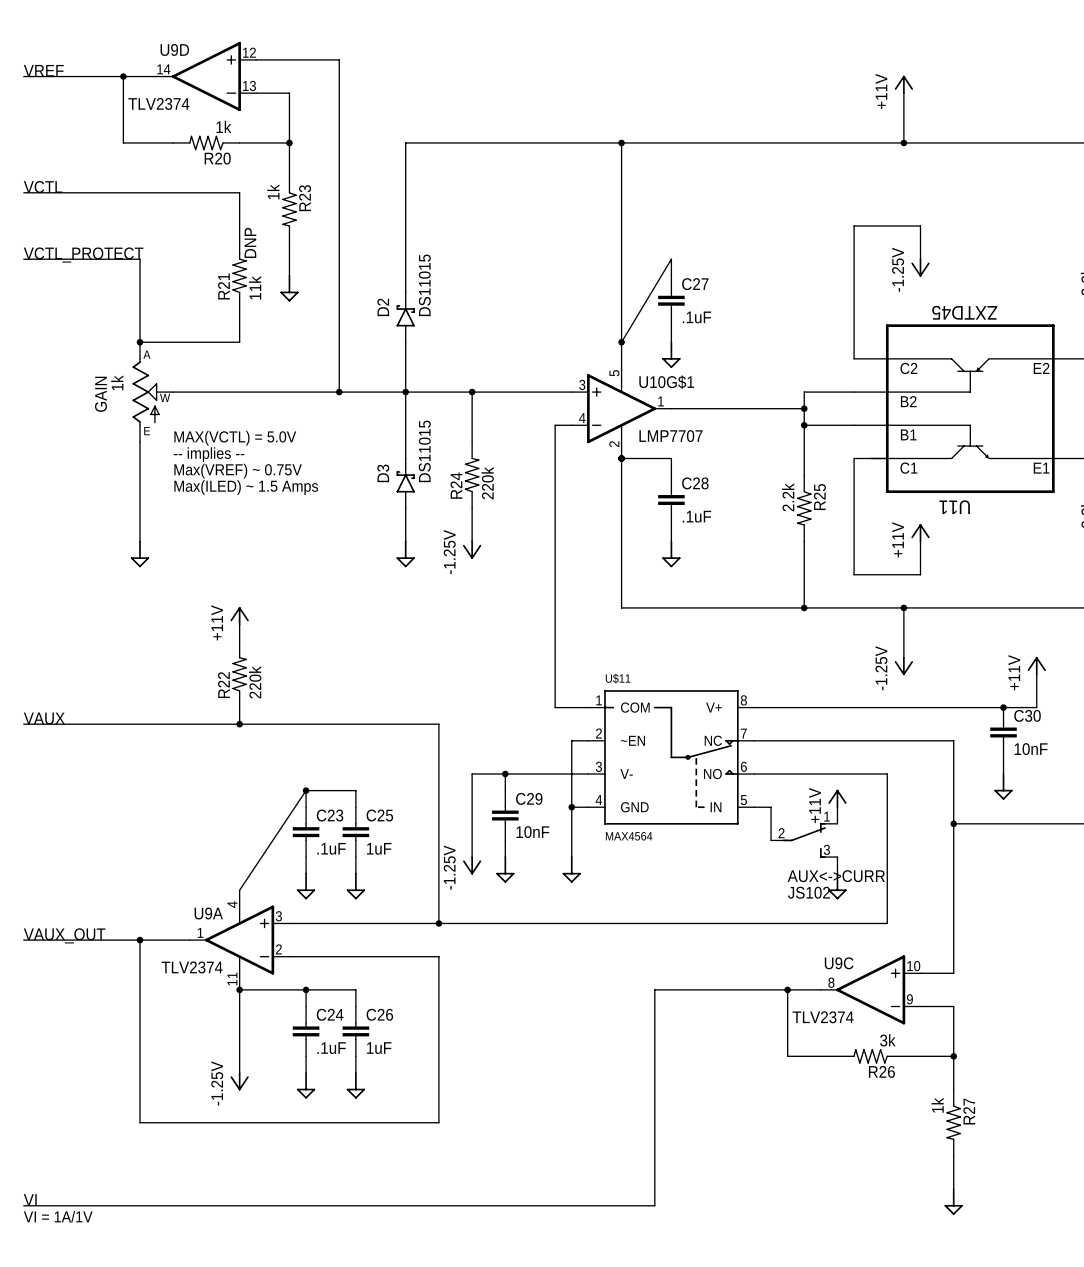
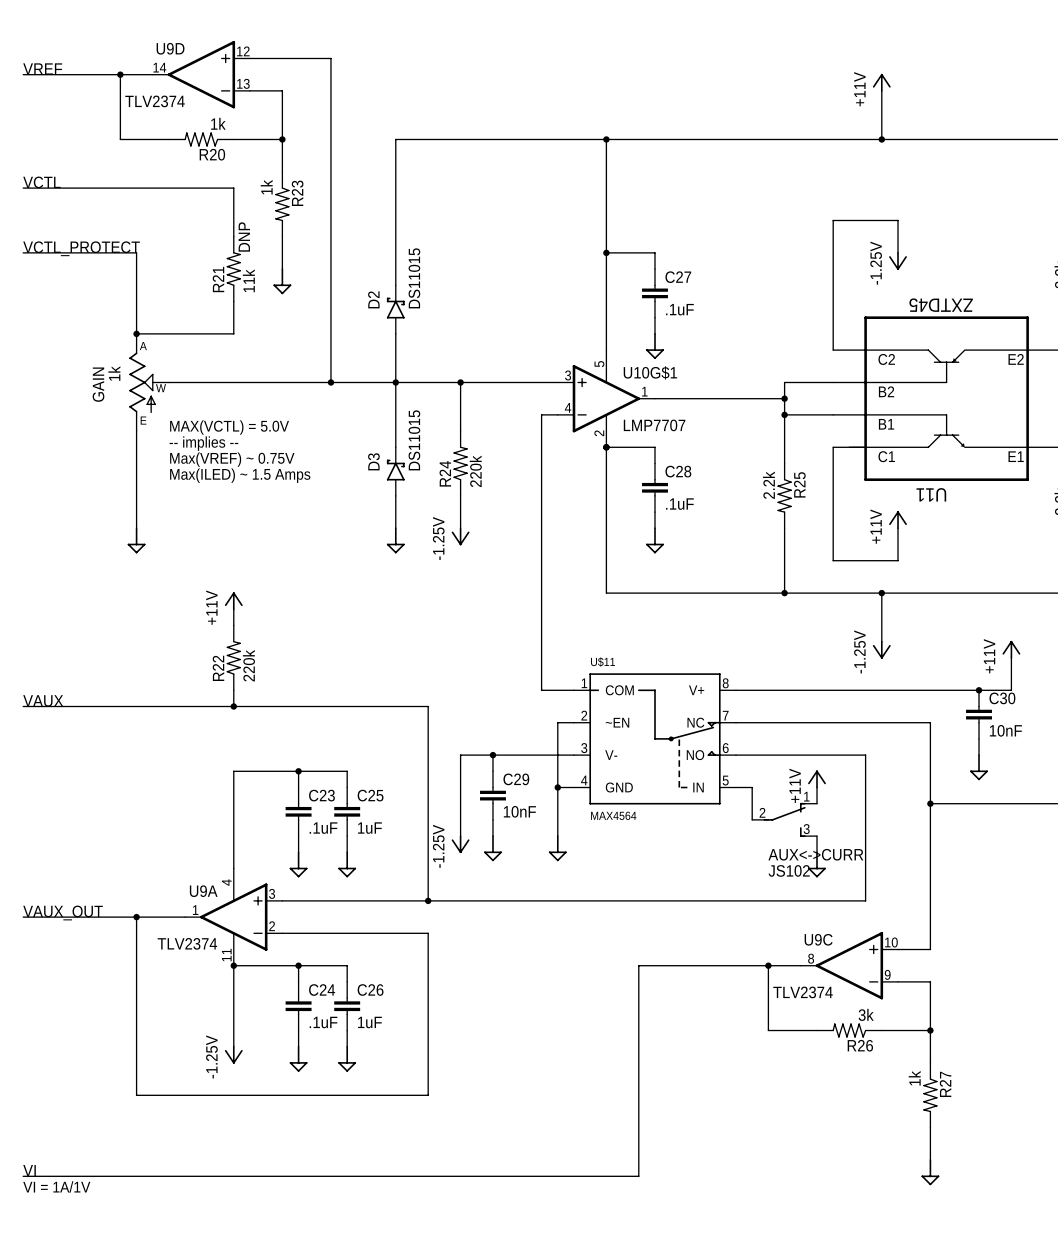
junction: none -> (606, 252)
wire: (671, 259) (621, 342) -> (654, 252) (606, 252)
junction: (621, 342) -> none
wire: (306, 790) (239, 890) -> (298, 771) (233, 771) (233, 868)

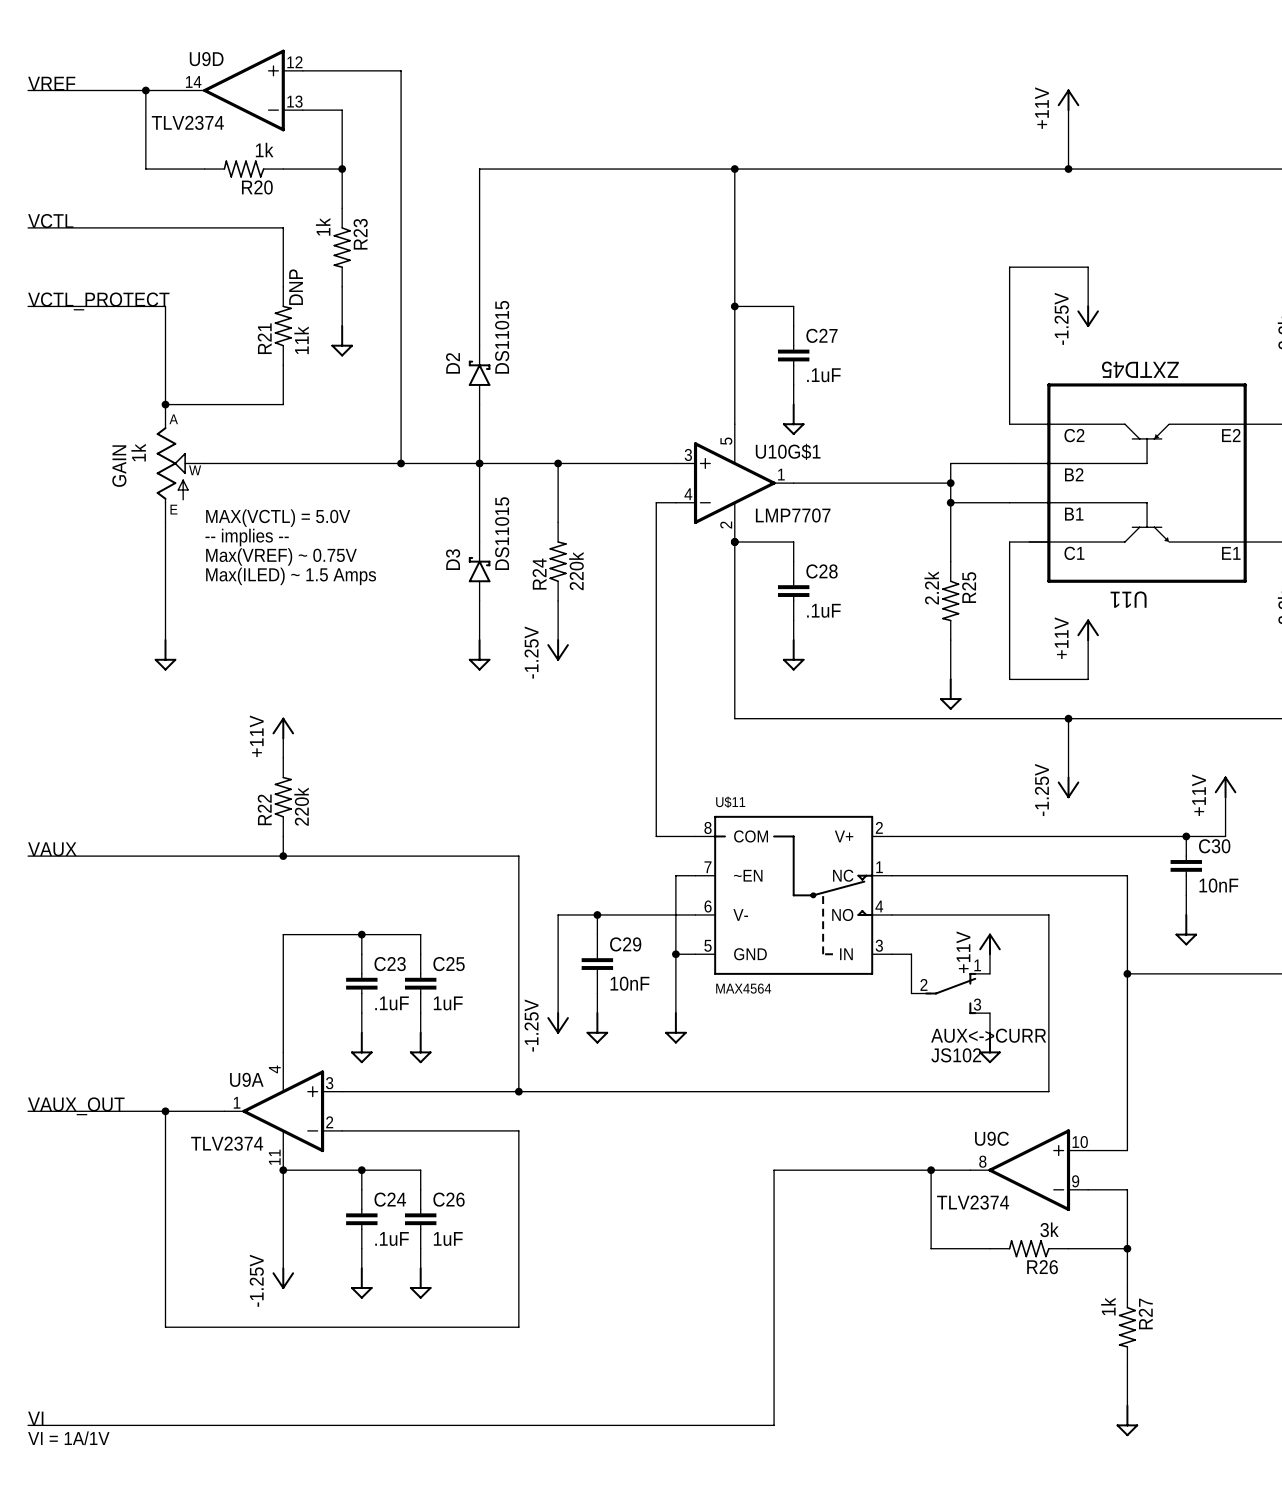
part: none -> (950, 694)
junction: (784, 593) -> none
U$11 pin number: 1 (584, 683) -> 8 (708, 827)
U$11 pin number: 8 (725, 683) -> 2 (879, 827)
U$11 pin number: 2 (584, 715) -> 7 (708, 867)
U$11 pin number: 7 (725, 715) -> 1 (879, 867)
U$11 pin number: 3 (584, 748) -> 6 (708, 906)
U$11 pin number: 6 (725, 748) -> 4 (879, 906)
U$11 pin number: 4 (584, 780) -> 5 (708, 945)
U$11 pin number: 5 (725, 780) -> 3 (879, 945)

